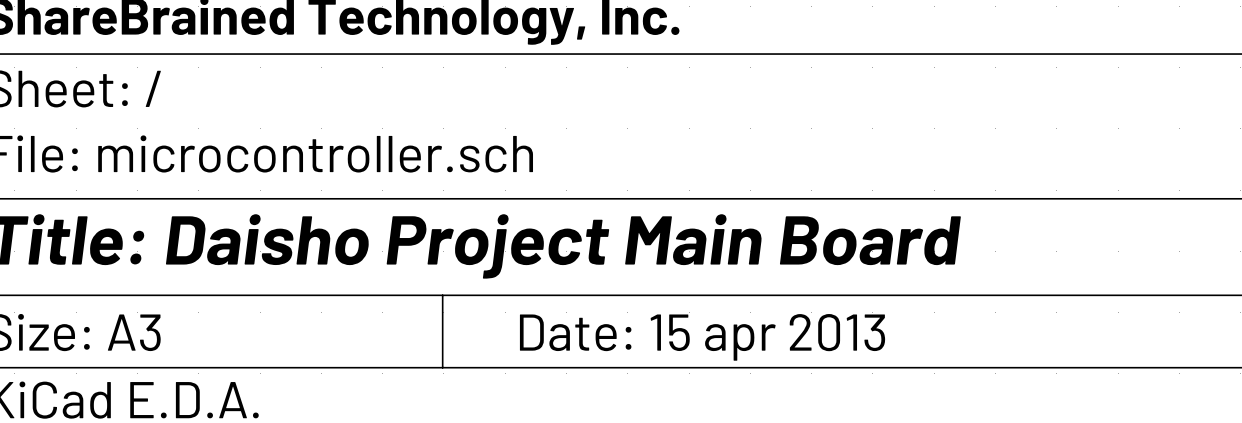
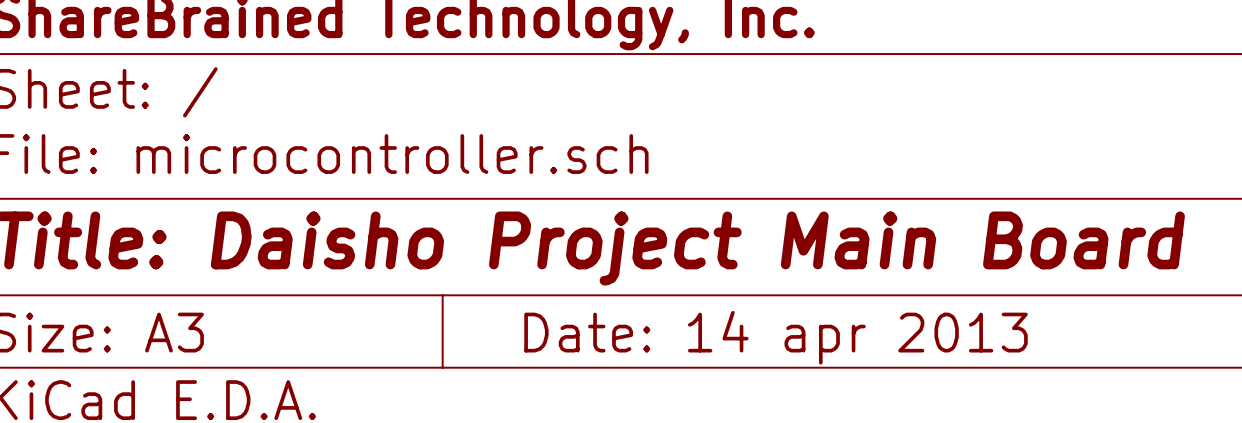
title block: Date: 15 apr 2013 (702, 337) -> Date: 14 apr 2013 (776, 337)

